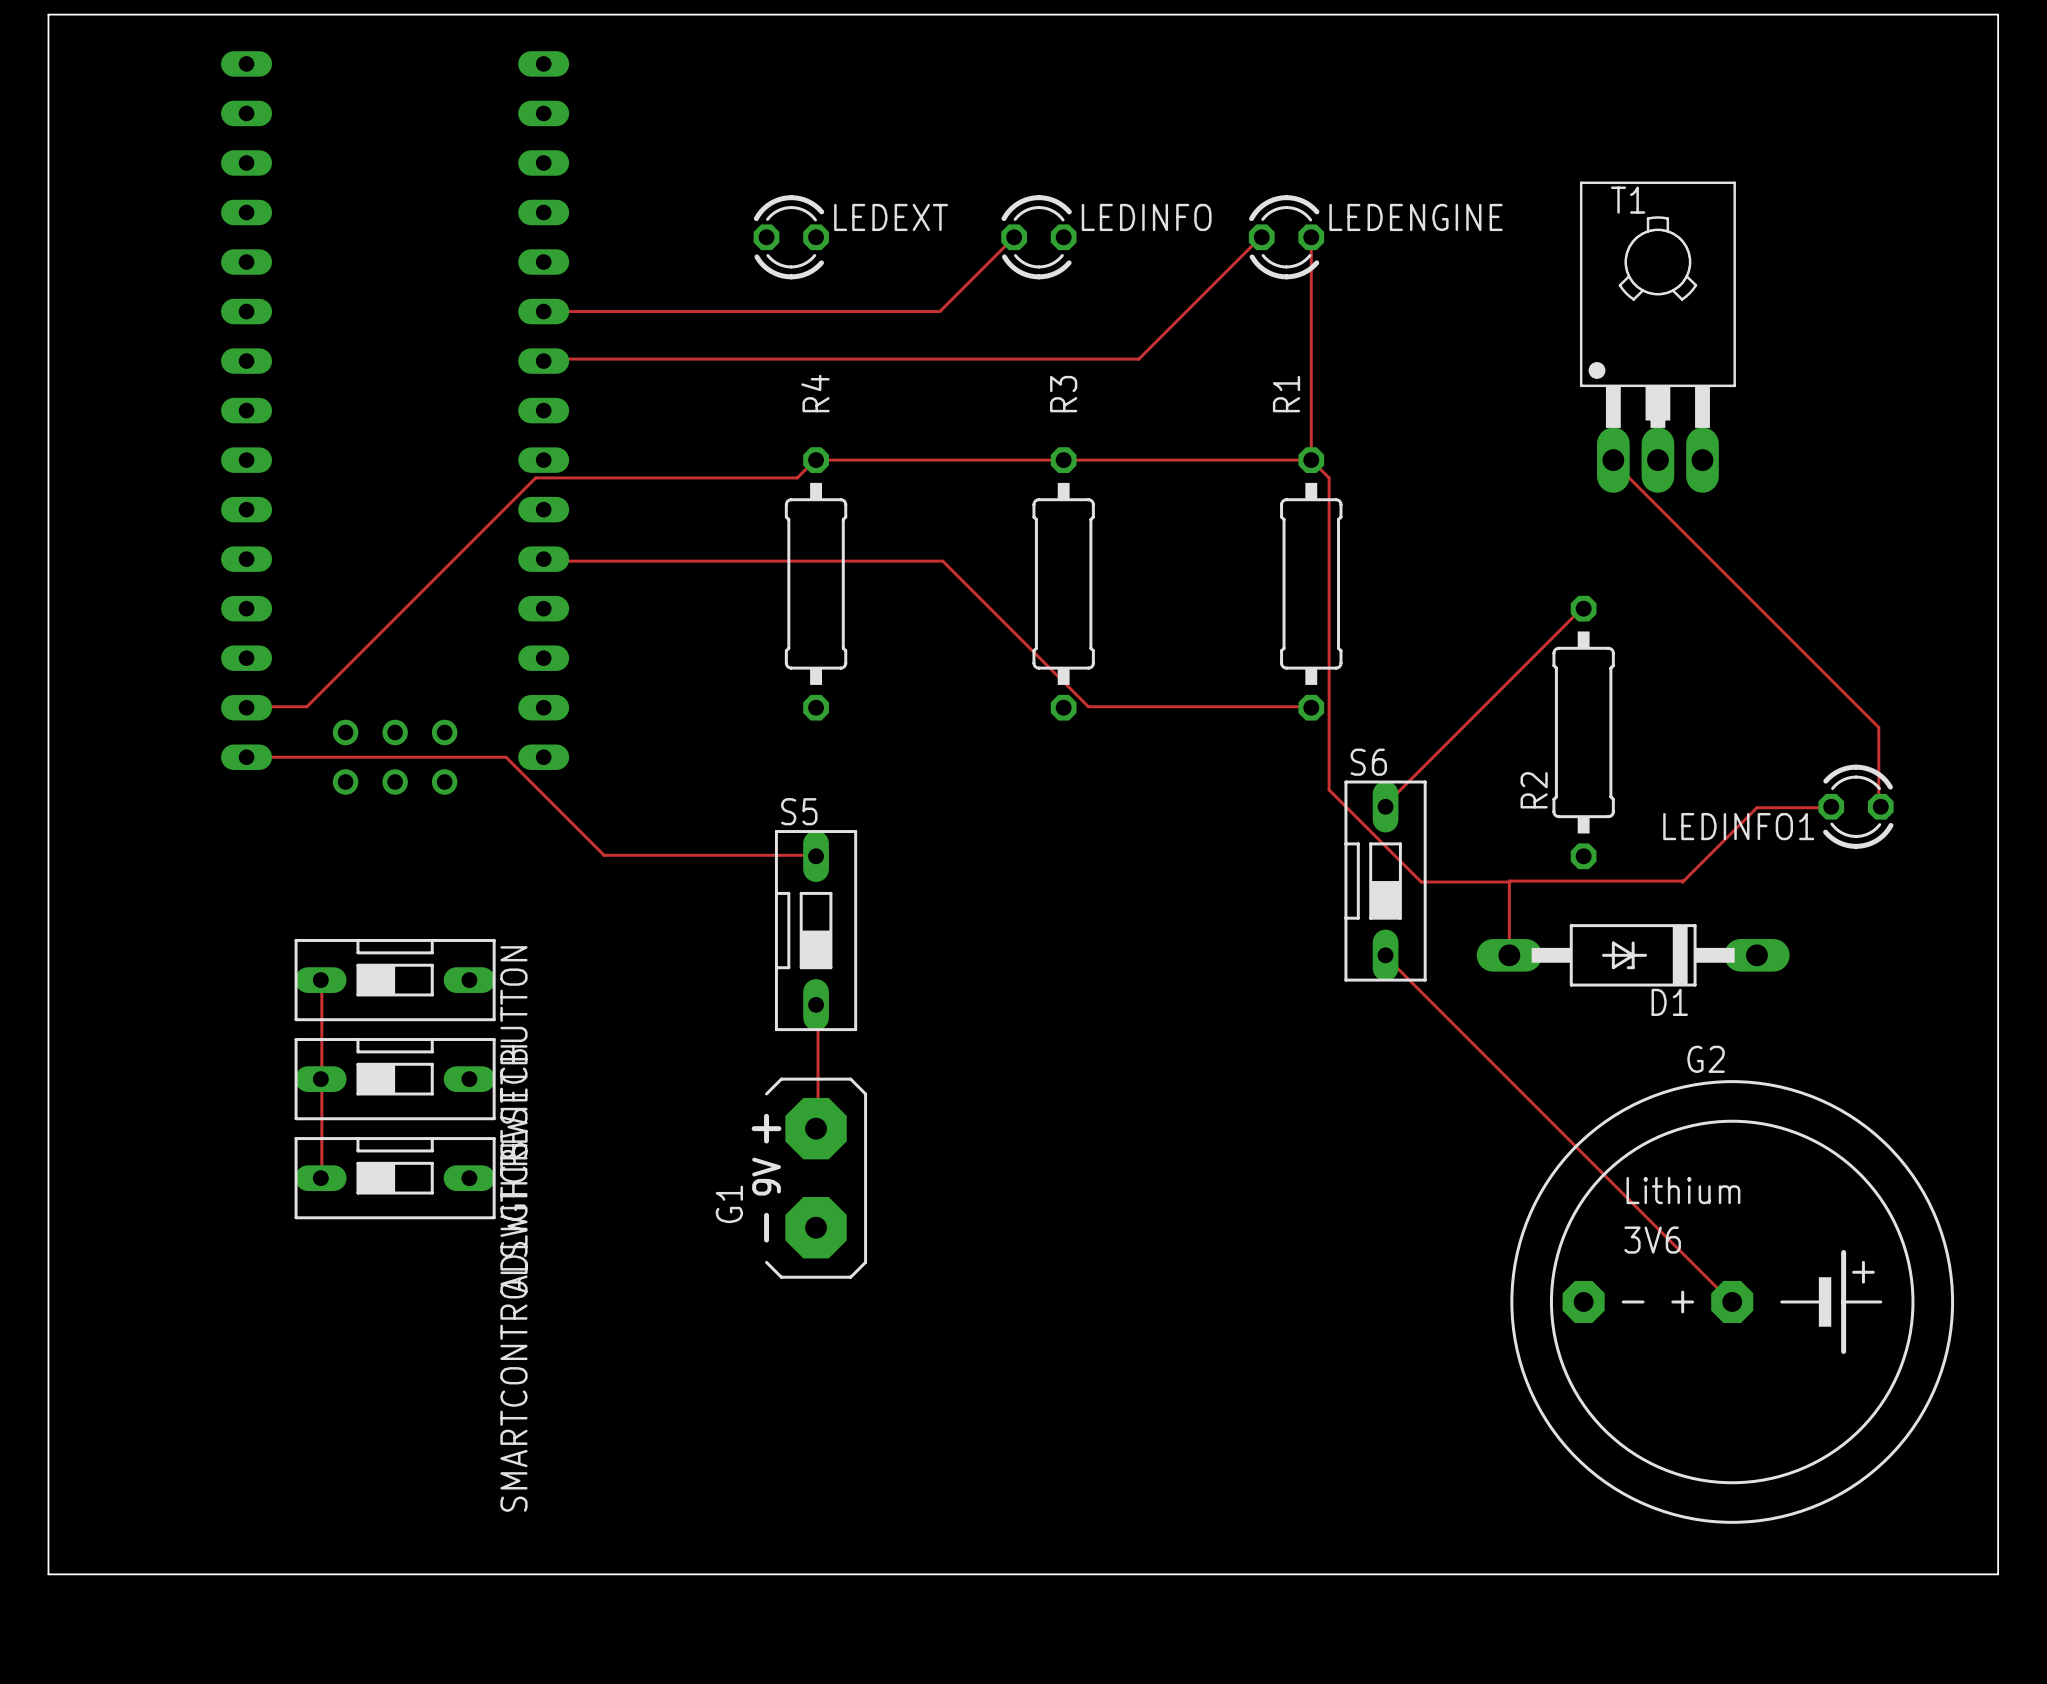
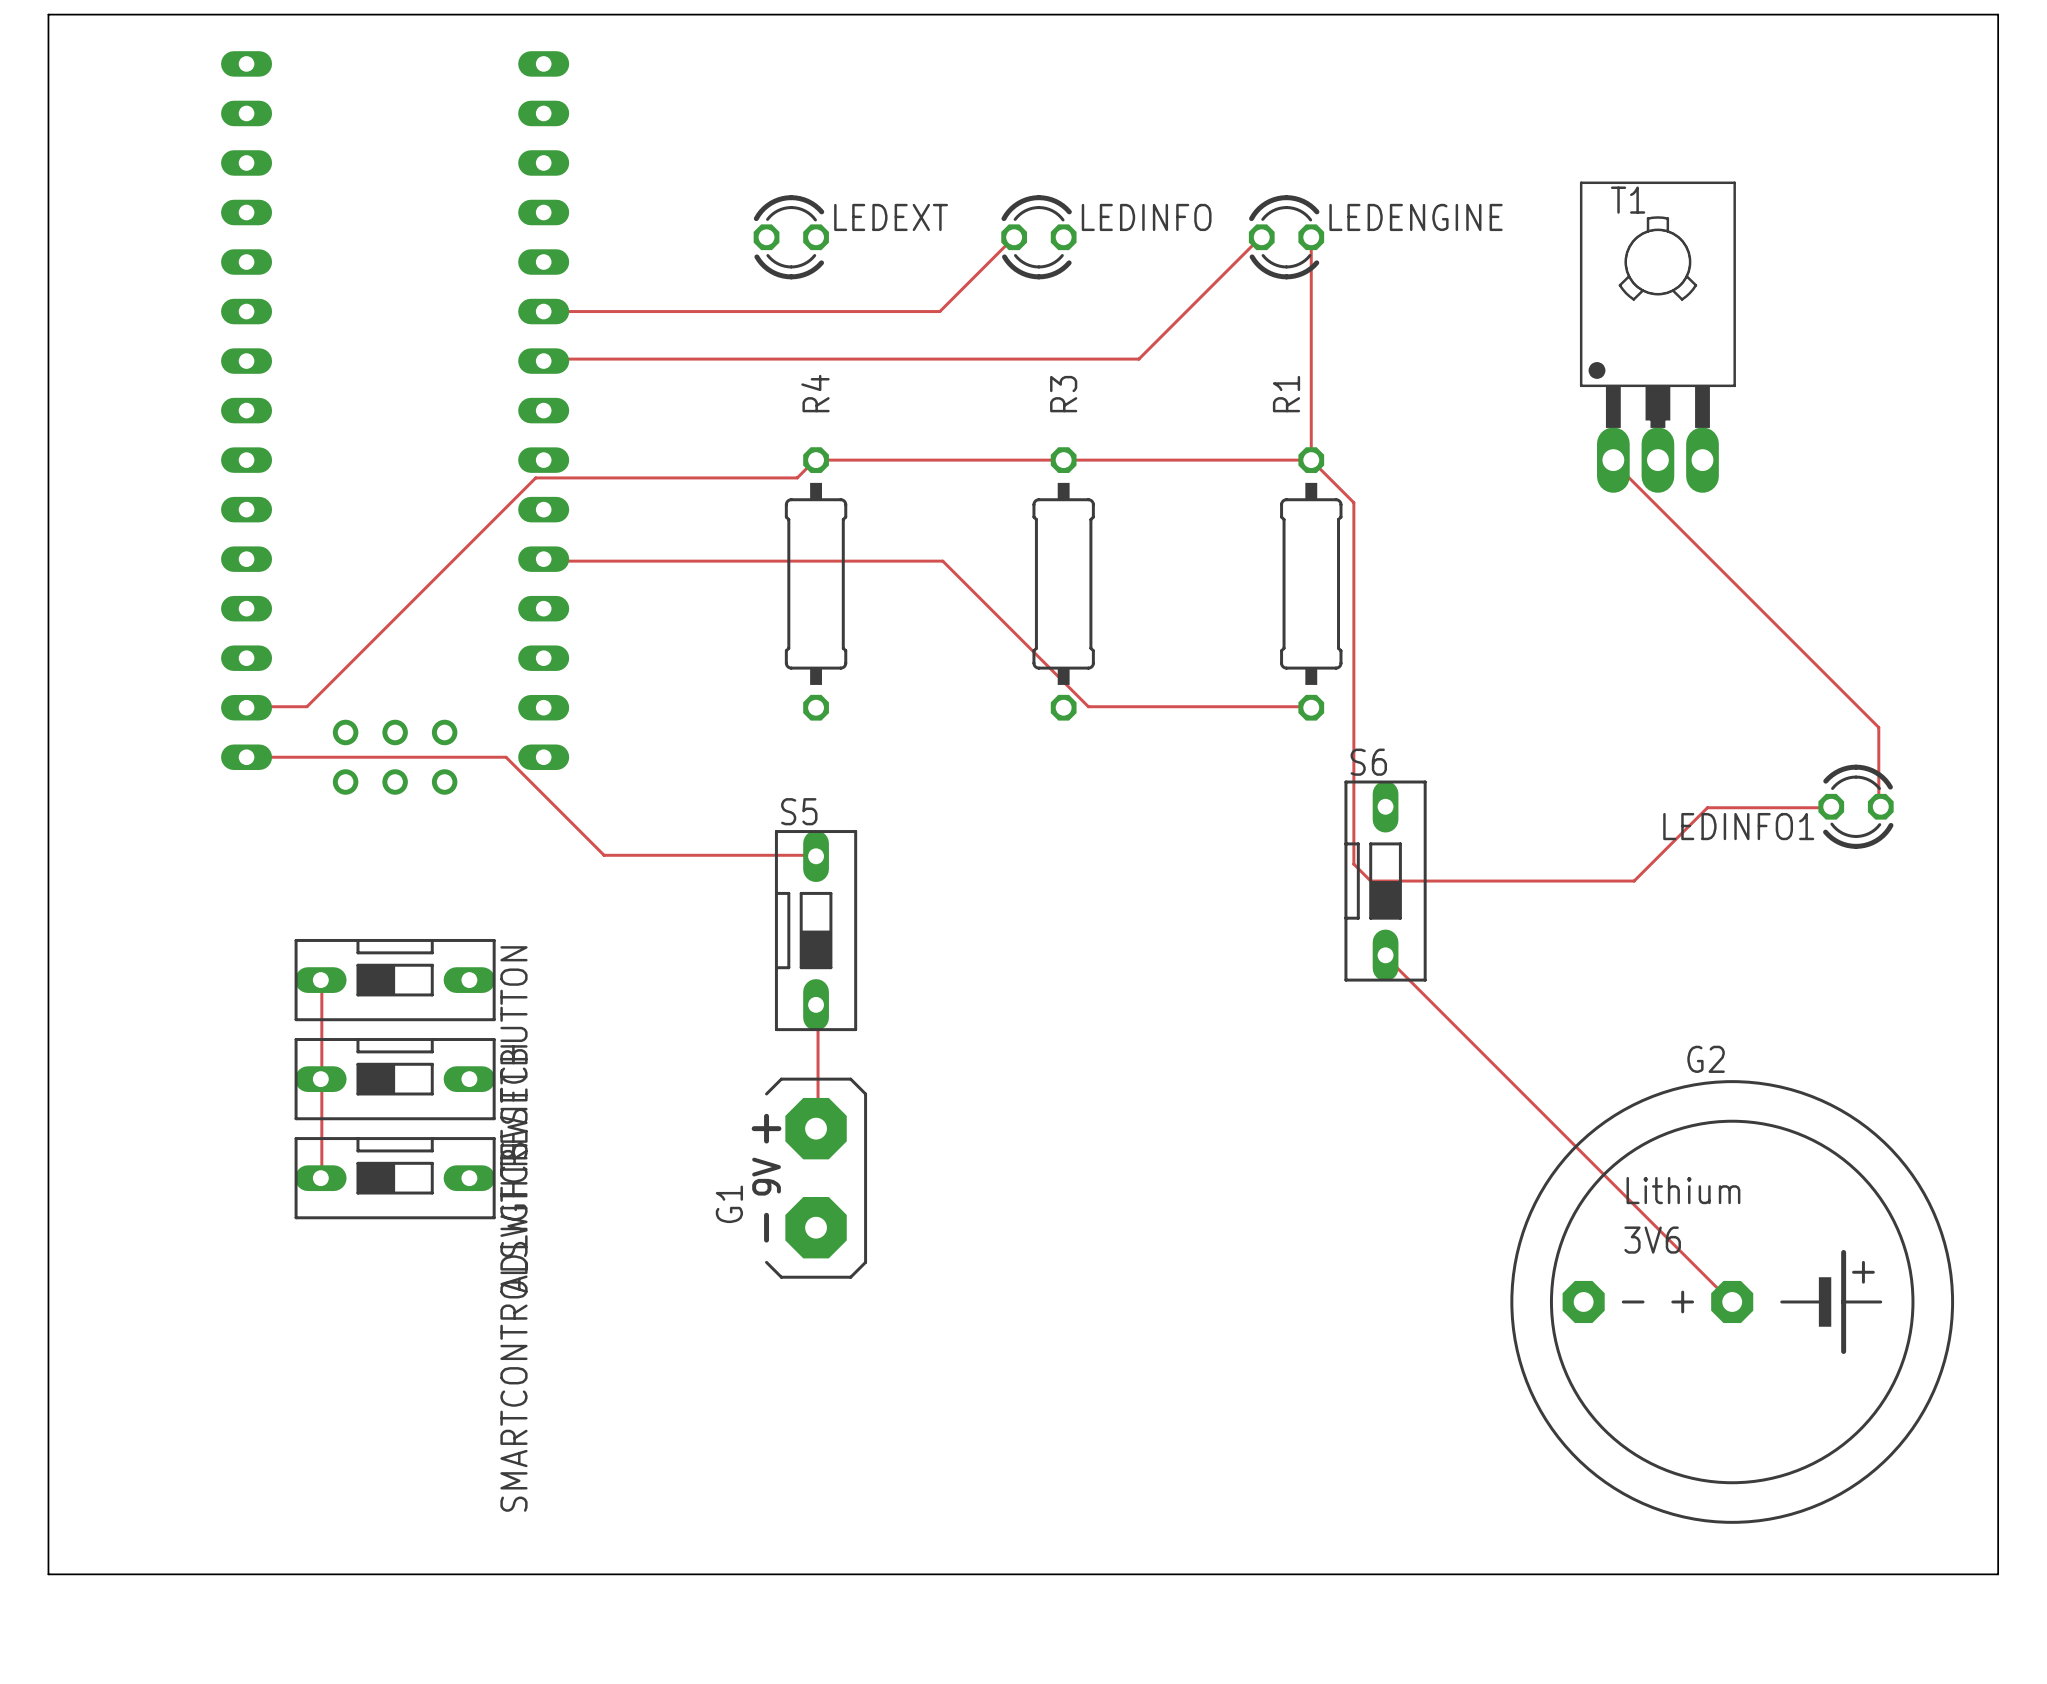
track: (1329, 477) (1329, 789) (1421, 882) (1510, 882) -> (1329, 477) (1353, 502) (1353, 864) (1370, 881) (1509, 881)
track: (1583, 608) (1385, 806) -> none
R2: (1583, 732) -> none
track: (1756, 807) (1682, 882) (1634, 881) -> (1756, 807) (1707, 807) (1634, 881)
track: (1509, 881) (1509, 955) -> none
D1: (1633, 955) -> none

